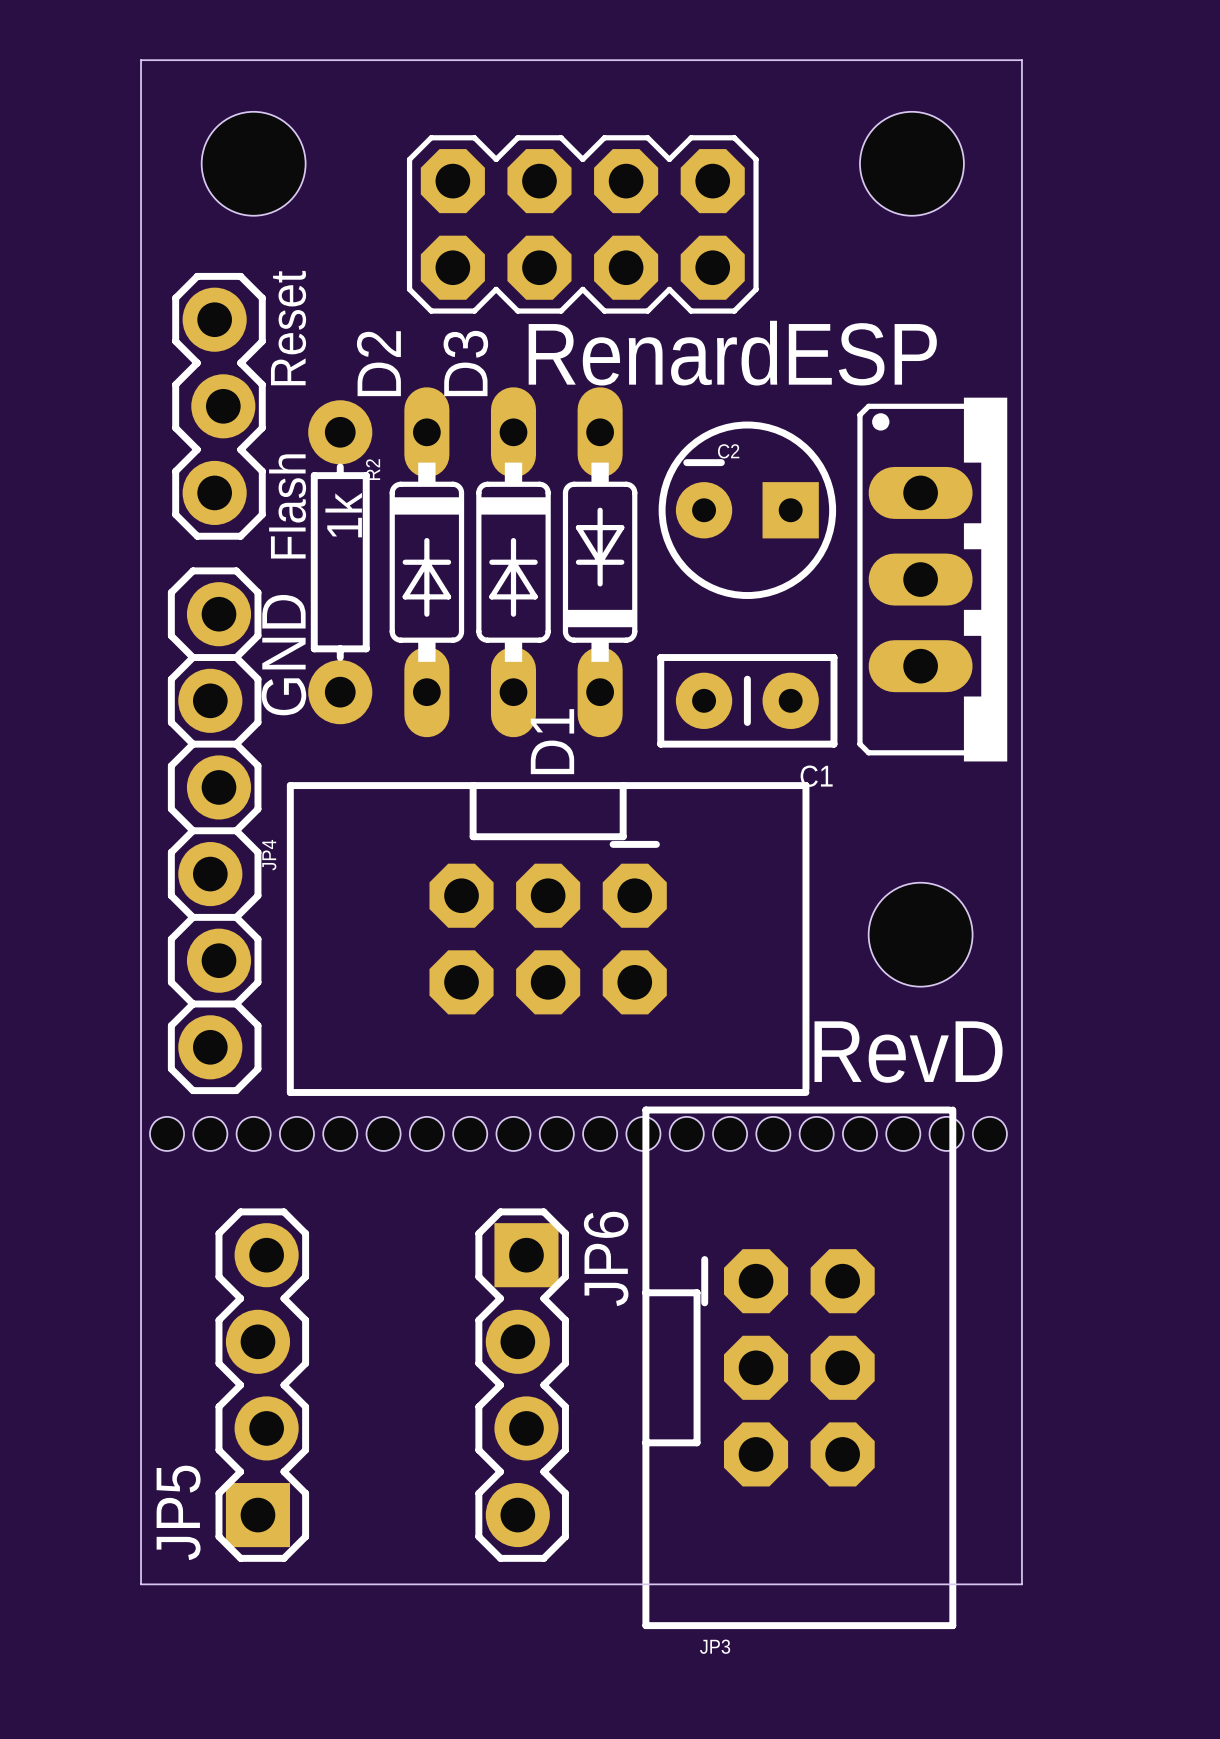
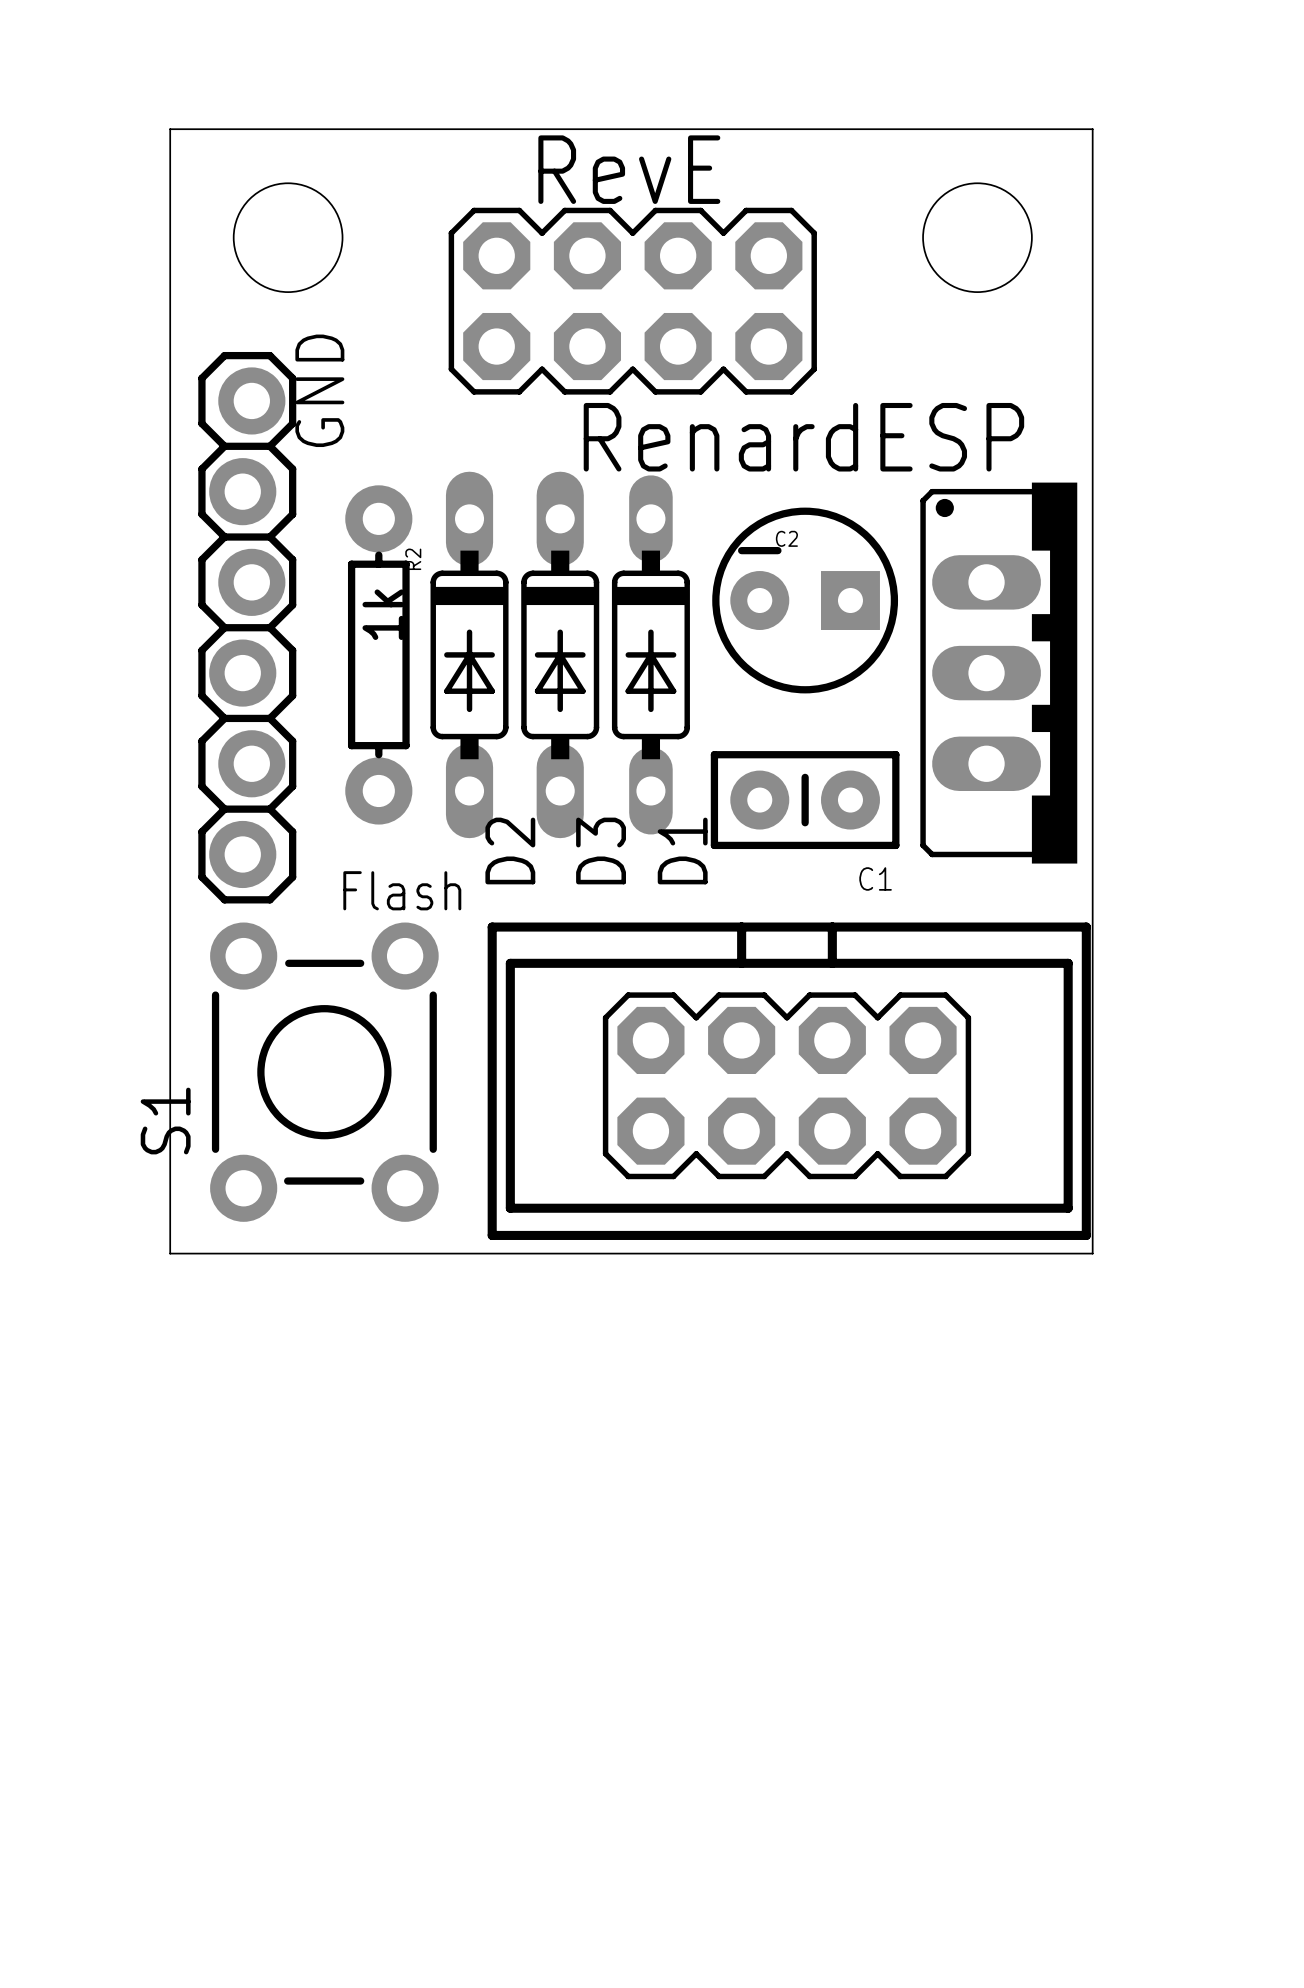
text: none -> RevE (629, 169)
text: Reset (288, 328) -> none
D2 name position: D2 (378, 363) -> D2 (510, 850)
D3 name position: D3 (465, 363) -> D3 (601, 850)
D1 footprint: [562, 387, 638, 738] -> [611, 475, 690, 835]
part: (218, 406) -> none
text rotation: 0° (287, 506) -> 90° clockwise (402, 890)
text position: Flash (287, 506) -> Flash (402, 890)
text position: GND (283, 655) -> GND (319, 390)
D1 name position: D1 (552, 741) -> D1 (682, 850)
line: none -> (492, 927) (1086, 927) (1086, 1235) (492, 1235) (492, 927)
line: none -> (741, 927) (741, 963)
line: none -> (832, 927) (832, 963)
part position: (214, 830) -> (247, 627)
line: none -> (510, 963) (1068, 963) (1068, 1208) (510, 1208) (510, 963)
part: (920, 934) -> none
JP4: (548, 939) -> none
S1: none -> (324, 1072)
part: none -> (786, 1085)
text: RevD (908, 1052) -> none
board edge: (141, 1133) (141, 1584) (1021, 1584) (1021, 1133) -> (170, 1253) (1092, 1253)
hole: (167, 1133) -> none
hole: (210, 1133) -> none
hole: (253, 1133) -> none
hole: (296, 1133) -> none
hole: (340, 1133) -> none
hole: (383, 1133) -> none
hole: (426, 1133) -> none
hole: (470, 1133) -> none
hole: (513, 1133) -> none
hole: (556, 1133) -> none
hole: (600, 1133) -> none
hole: (643, 1133) -> none
hole: (686, 1133) -> none
hole: (730, 1133) -> none
hole: (773, 1133) -> none
hole: (816, 1133) -> none
hole: (859, 1133) -> none
hole: (903, 1133) -> none
hole: (946, 1133) -> none
hole: (989, 1133) -> none
JP3: (799, 1367) -> none
JP5: (262, 1385) -> none
JP6: (522, 1385) -> none

